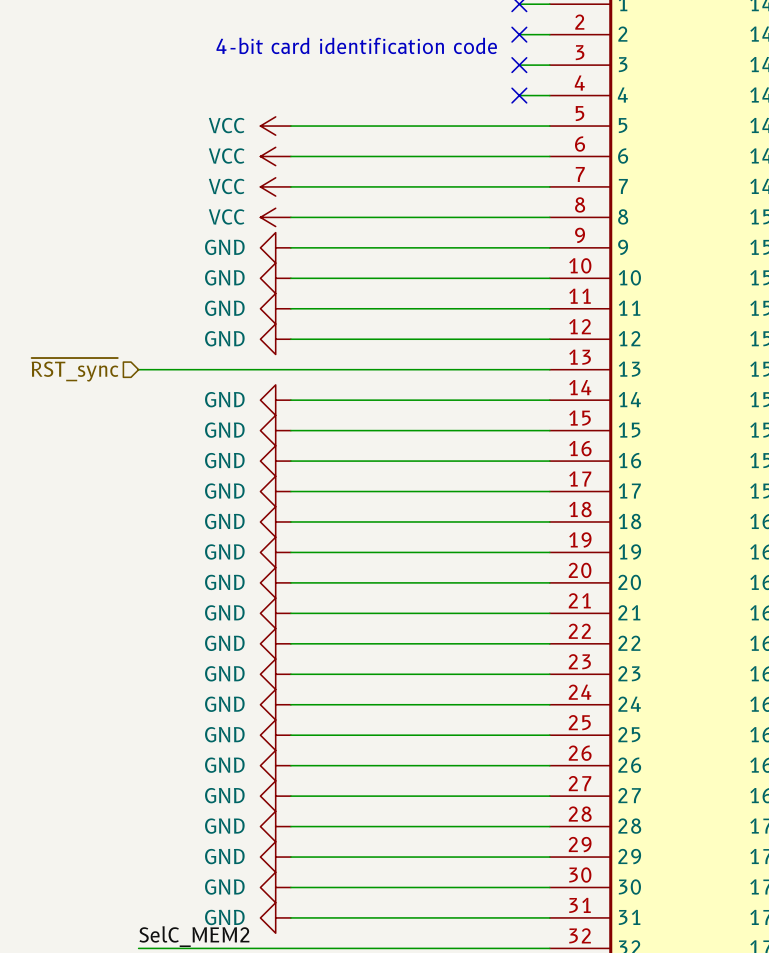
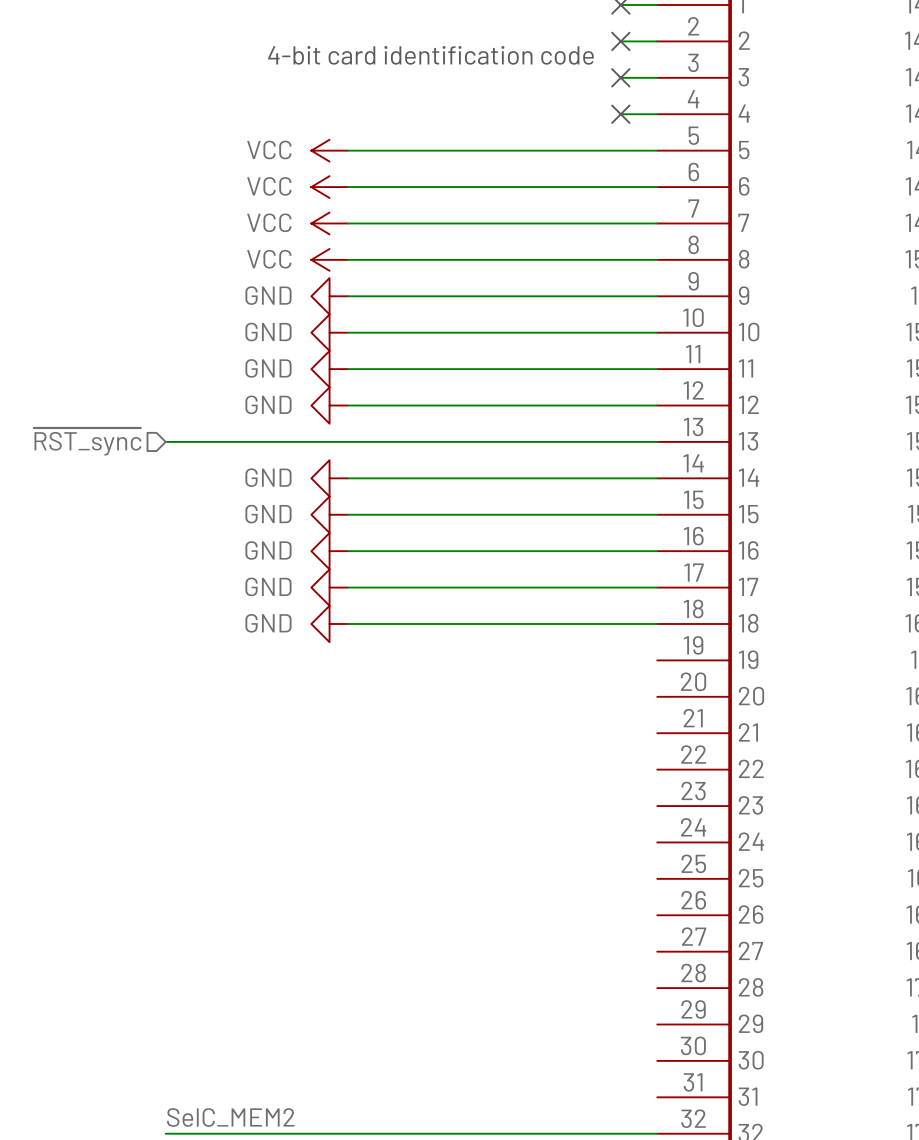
power symbol: GND (275, 552) -> none
wire: (290, 552) (549, 552) -> none
power symbol: GND (275, 582) -> none
wire: (290, 582) (549, 582) -> none
power symbol: GND (275, 613) -> none
wire: (290, 613) (549, 613) -> none
power symbol: GND (275, 643) -> none
wire: (290, 643) (549, 643) -> none
power symbol: GND (275, 674) -> none
wire: (290, 674) (549, 674) -> none
power symbol: GND (275, 704) -> none
wire: (290, 704) (549, 704) -> none
power symbol: GND (275, 735) -> none
wire: (290, 735) (549, 735) -> none
power symbol: GND (275, 765) -> none
wire: (290, 765) (549, 765) -> none
power symbol: GND (275, 796) -> none
wire: (290, 796) (549, 796) -> none
power symbol: GND (275, 826) -> none
wire: (290, 826) (549, 826) -> none
power symbol: GND (275, 857) -> none
wire: (290, 857) (549, 857) -> none
power symbol: GND (275, 887) -> none
wire: (290, 887) (549, 887) -> none
power symbol: GND (275, 917) -> none
wire: (290, 917) (549, 917) -> none

